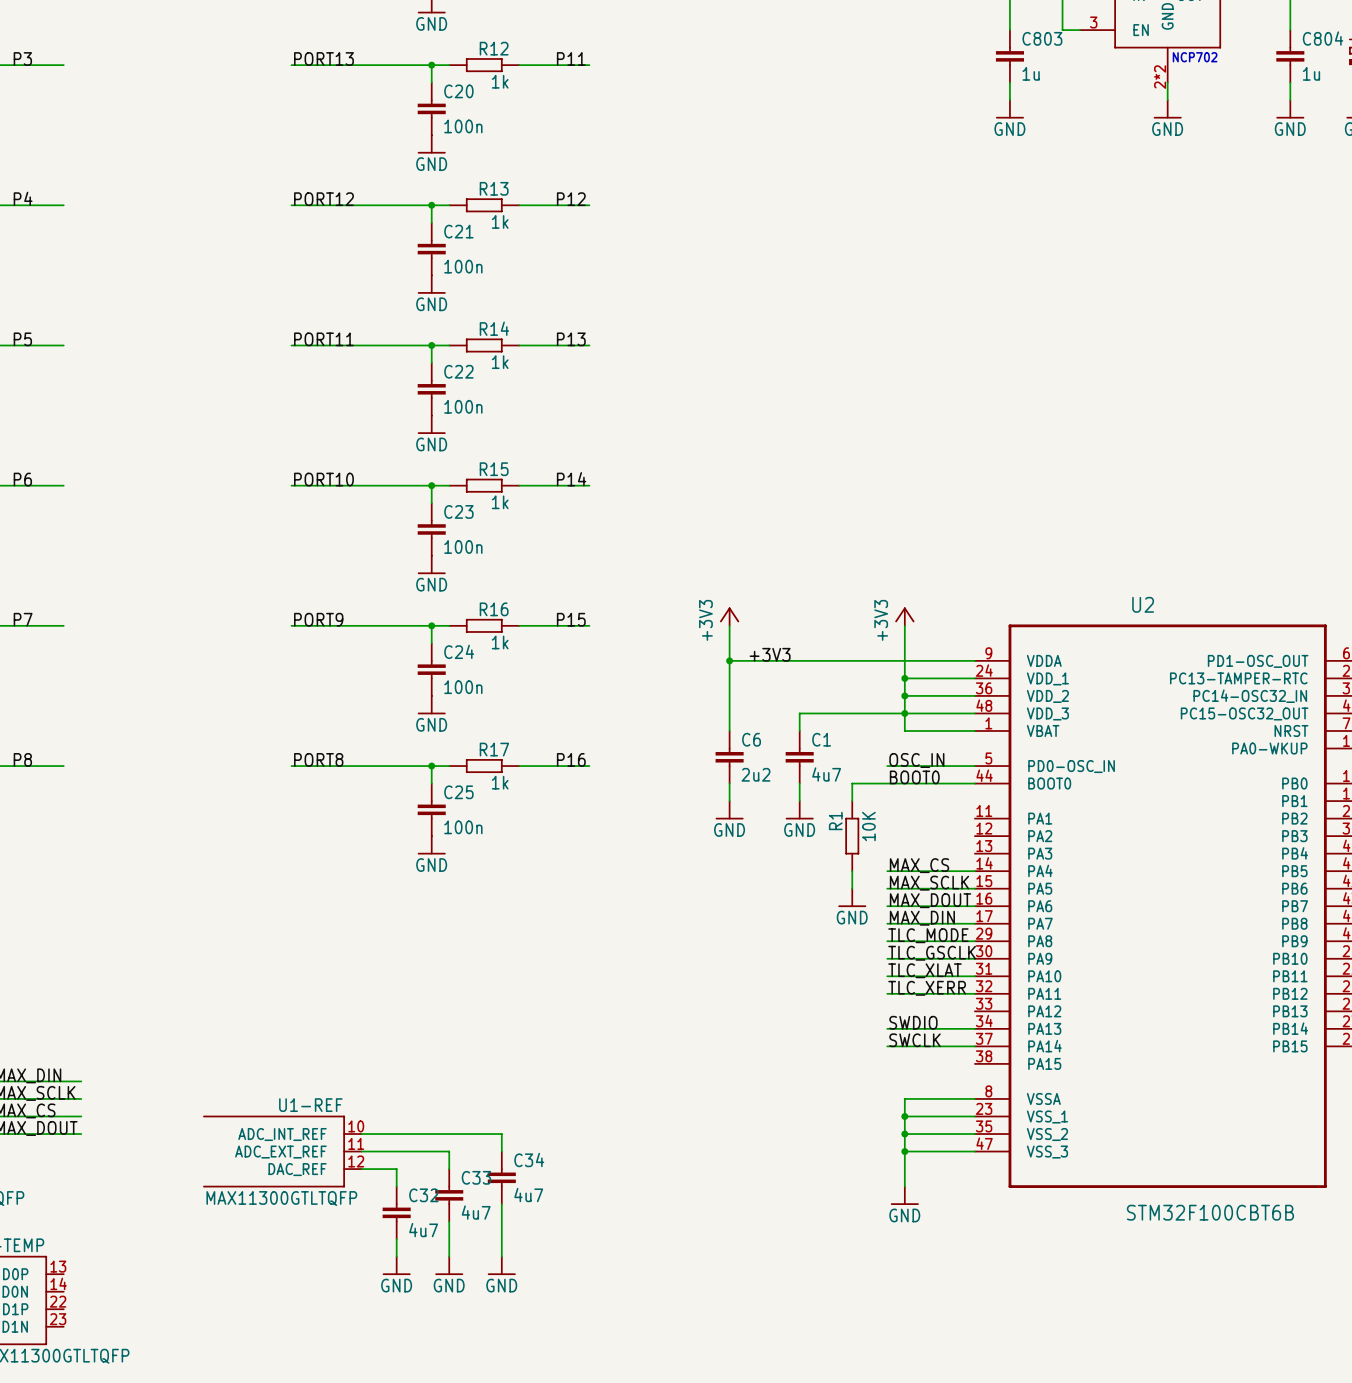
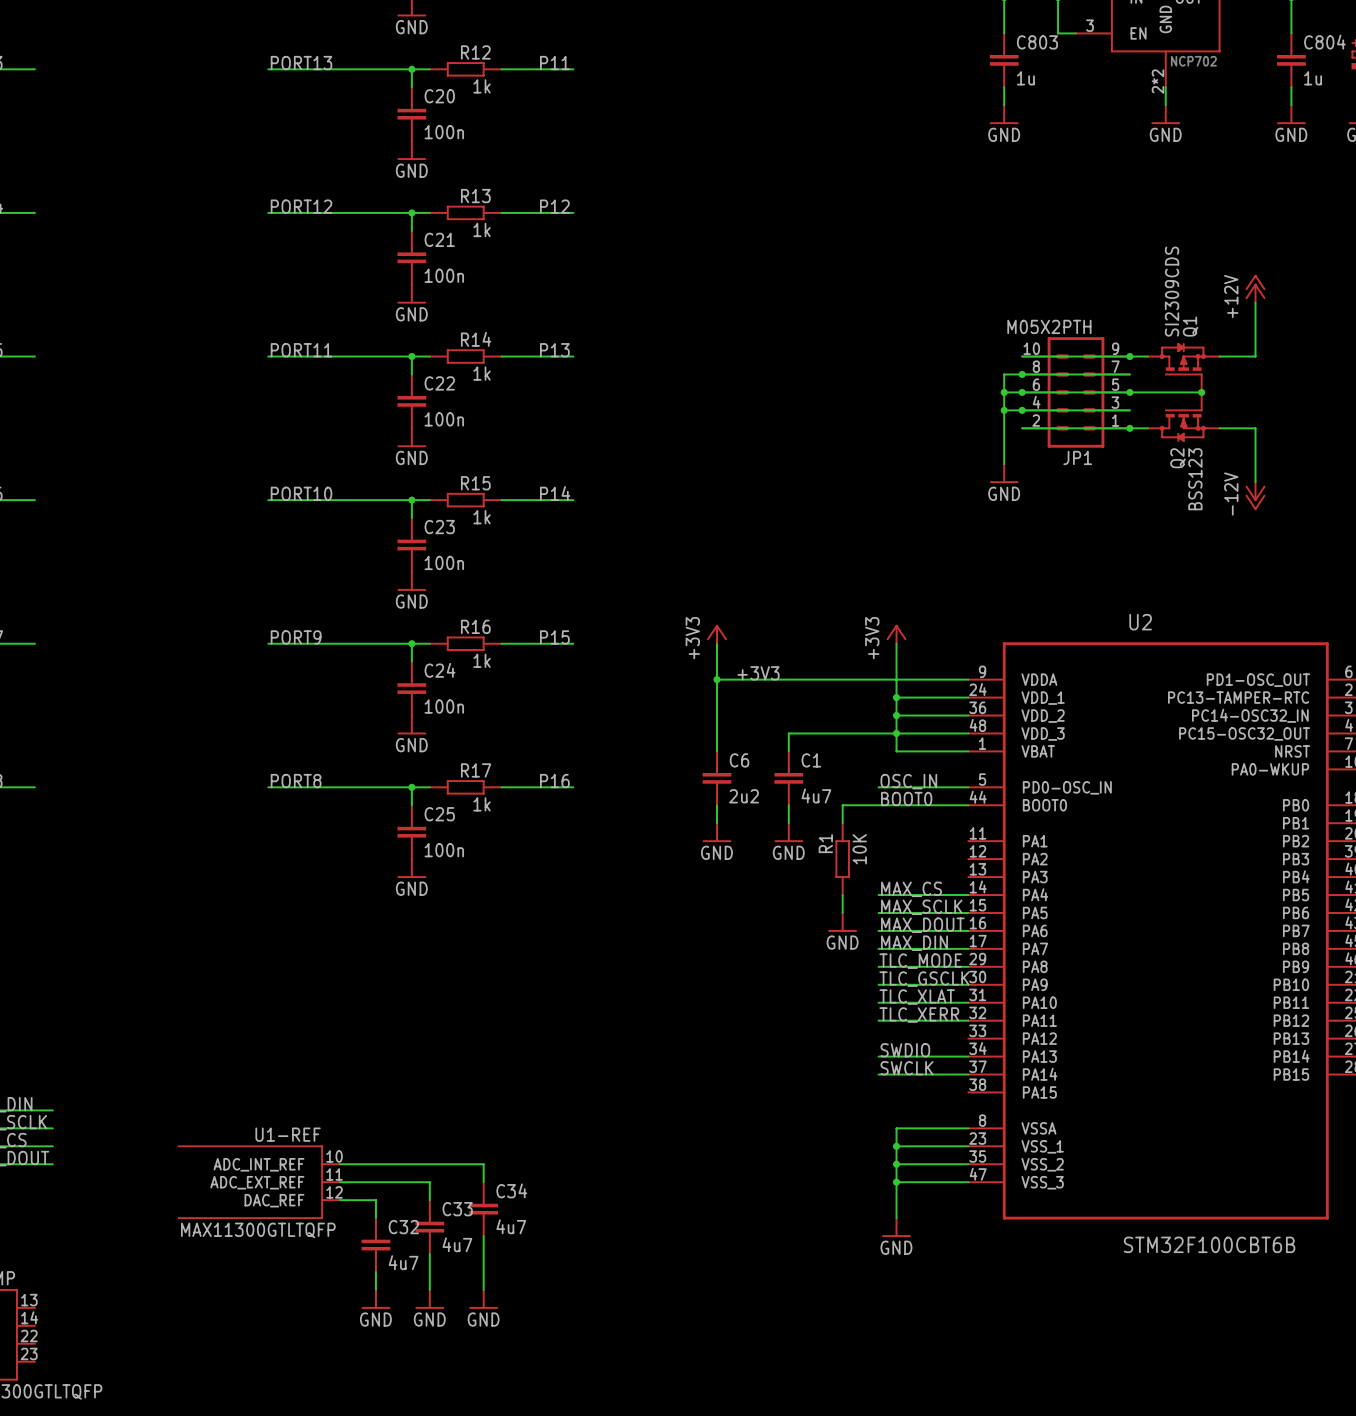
power symbol: none -> +12V (1255, 288)
wire: none -> (1255, 302) (1255, 356) (1219, 356)
wire: none -> (1022, 356) (1147, 356)
junction: none -> (1129, 356)
Q1: none -> SI2309CDS (1183, 367)
junction: none -> (1022, 374)
wire: none -> (1129, 374) (1004, 374) (1004, 464)
wire: none -> (1004, 392) (1201, 392)
junction: none -> (1004, 392)
junction: none -> (1022, 392)
JP1: none -> M05X2PTH (1076, 392)
junction: none -> (1129, 392)
junction: none -> (1201, 392)
wire: none -> (1004, 410) (1129, 410)
junction: none -> (1004, 410)
junction: none -> (1022, 410)
Q2: none -> BSS123 (1183, 416)
wire: none -> (1022, 428) (1147, 428)
junction: none -> (1129, 428)
wire: none -> (1219, 428) (1255, 428) (1255, 482)
power symbol: none -> GND (1004, 473)
power symbol: none -> -12V (1255, 496)

